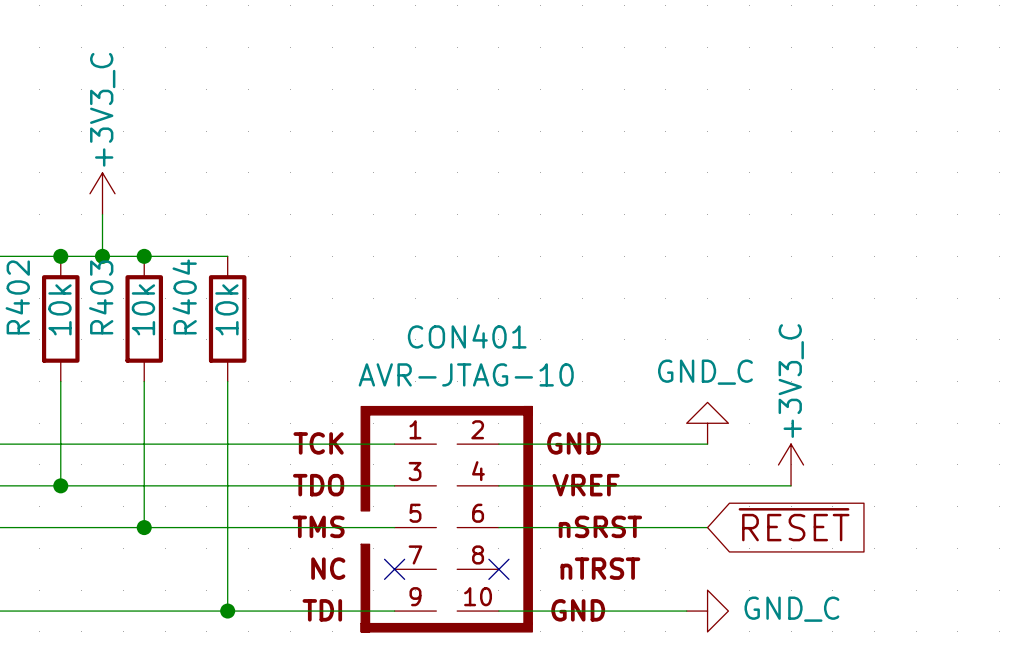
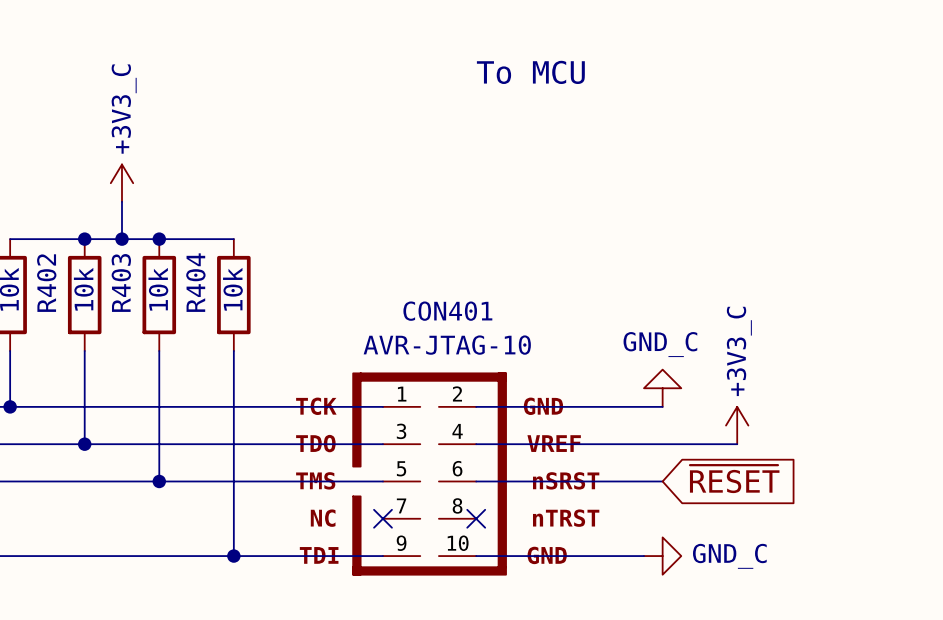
text: none -> To MCU (530, 72)

